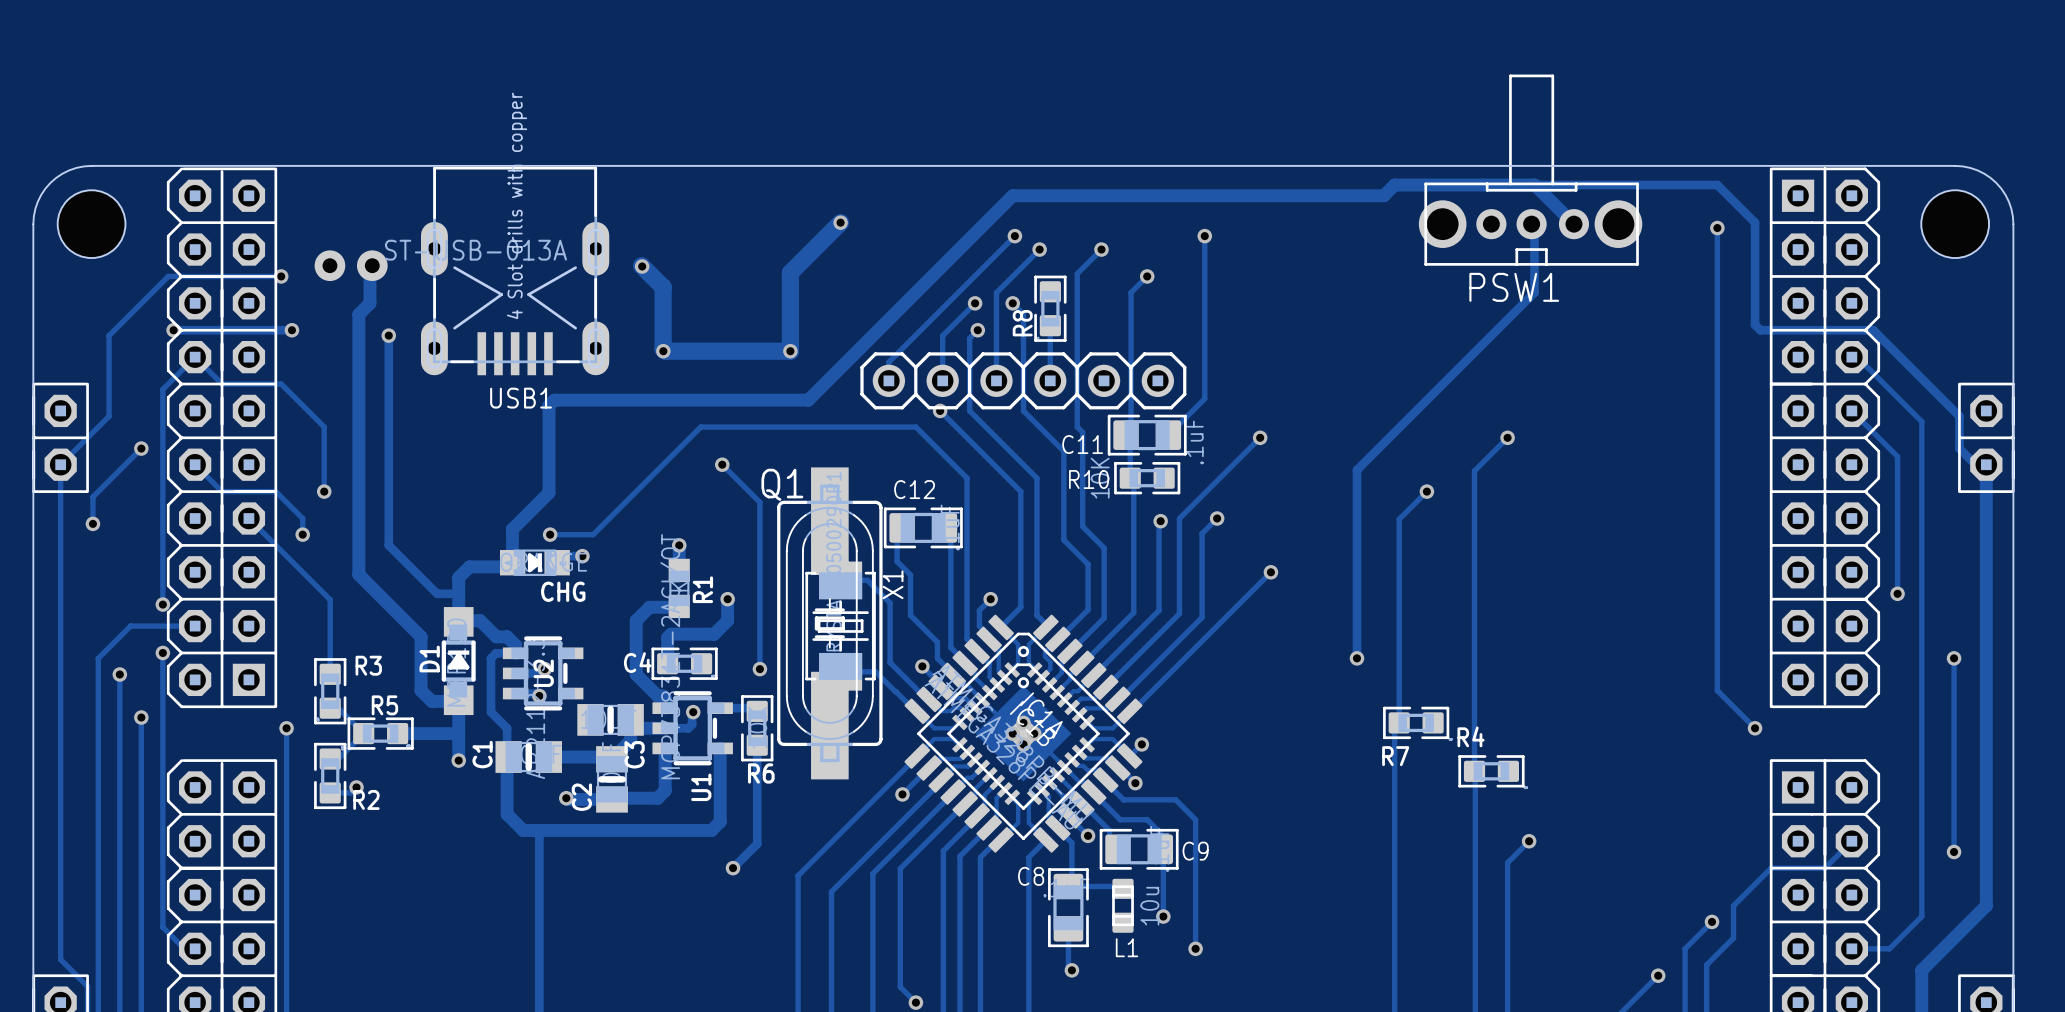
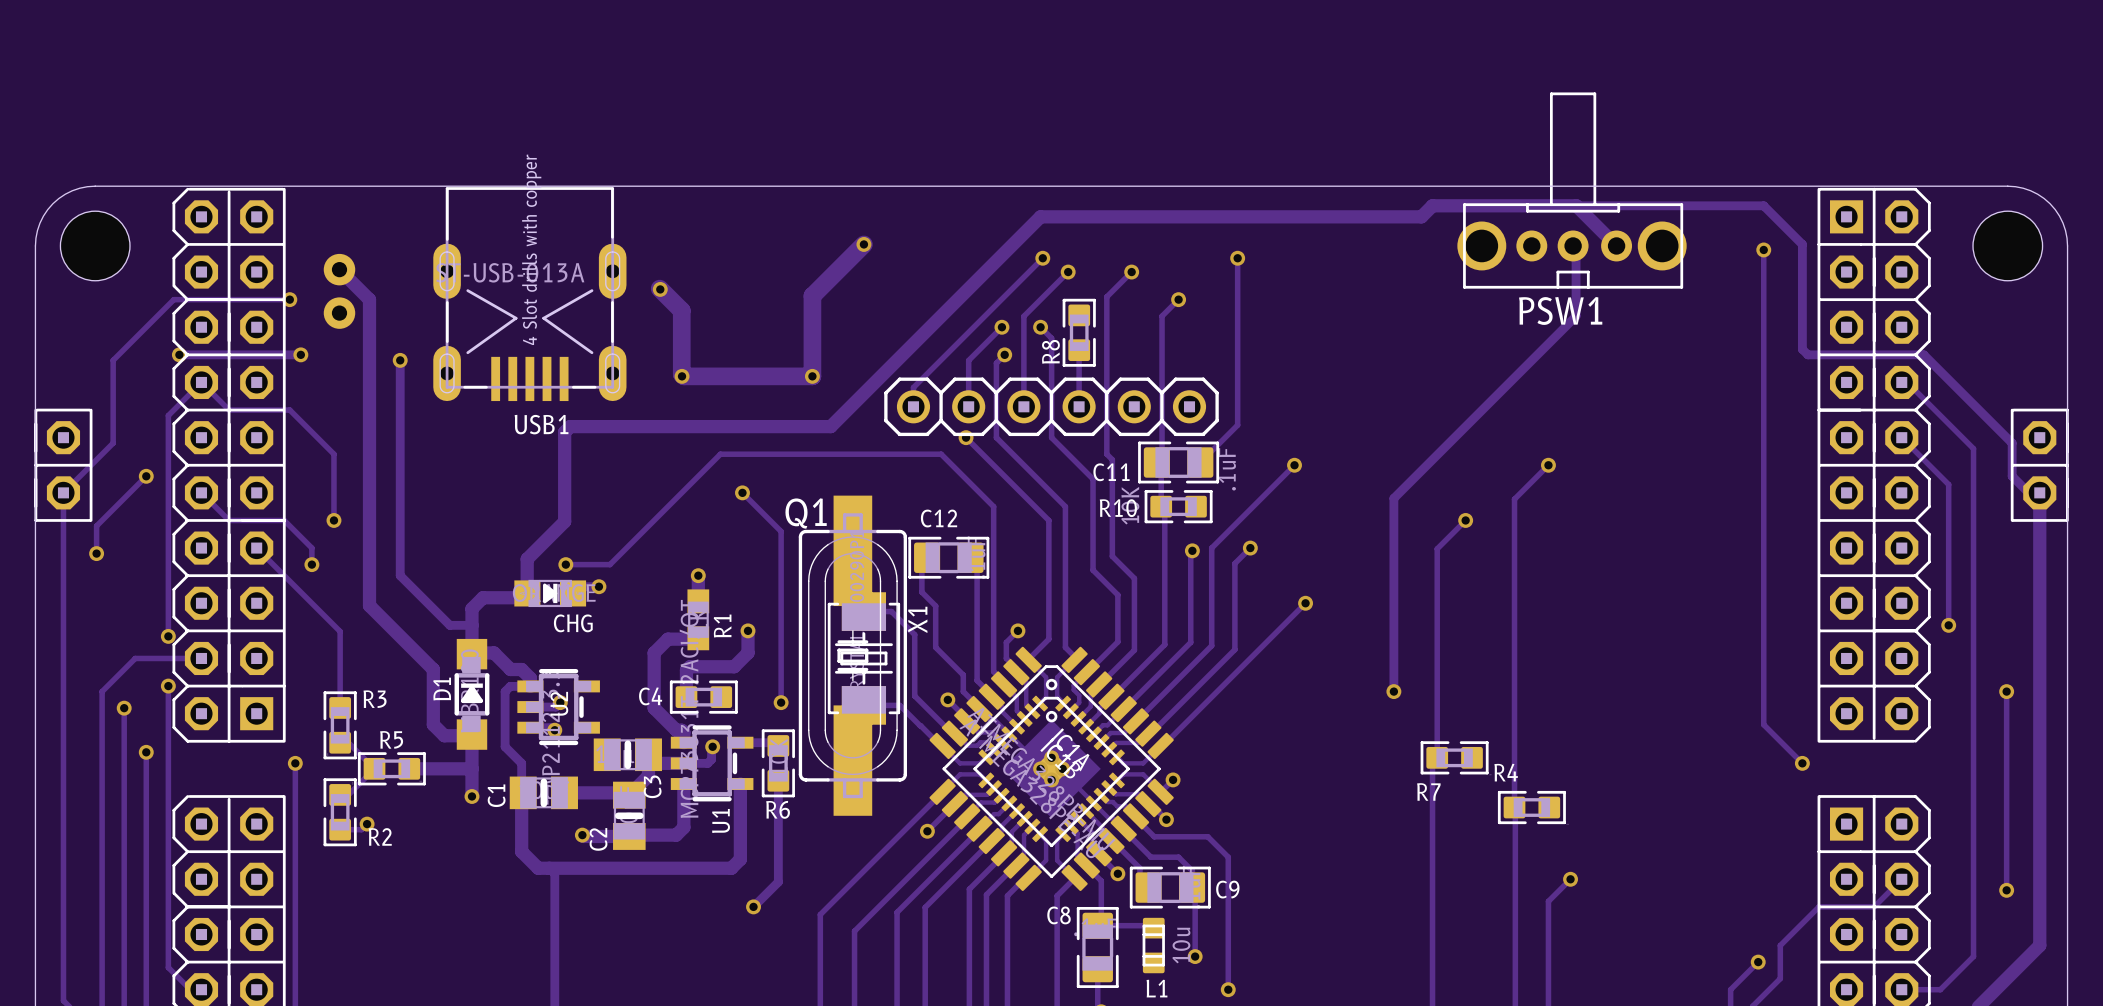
part rotation: 0° (351, 265) -> 90° clockwise (339, 291)
track: (372, 265) (369, 268) (369, 303) (358, 314) -> (339, 269) (369, 299) (369, 338)

